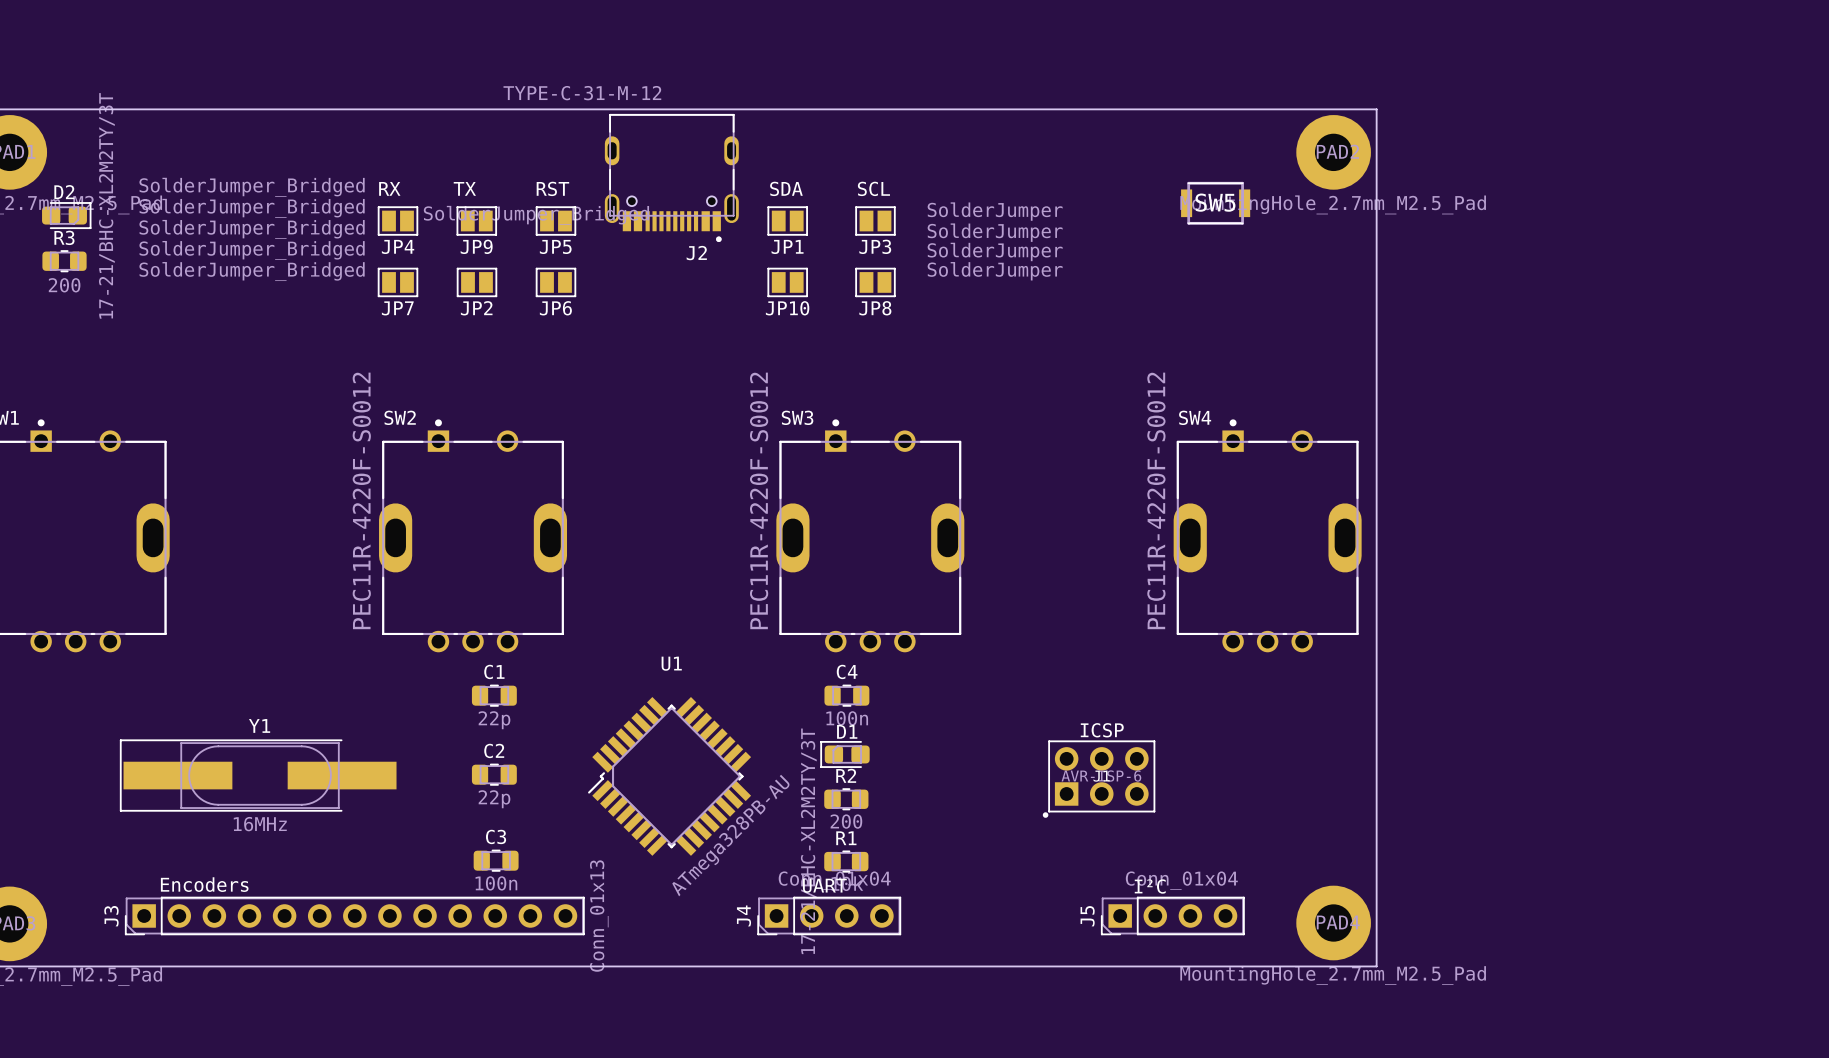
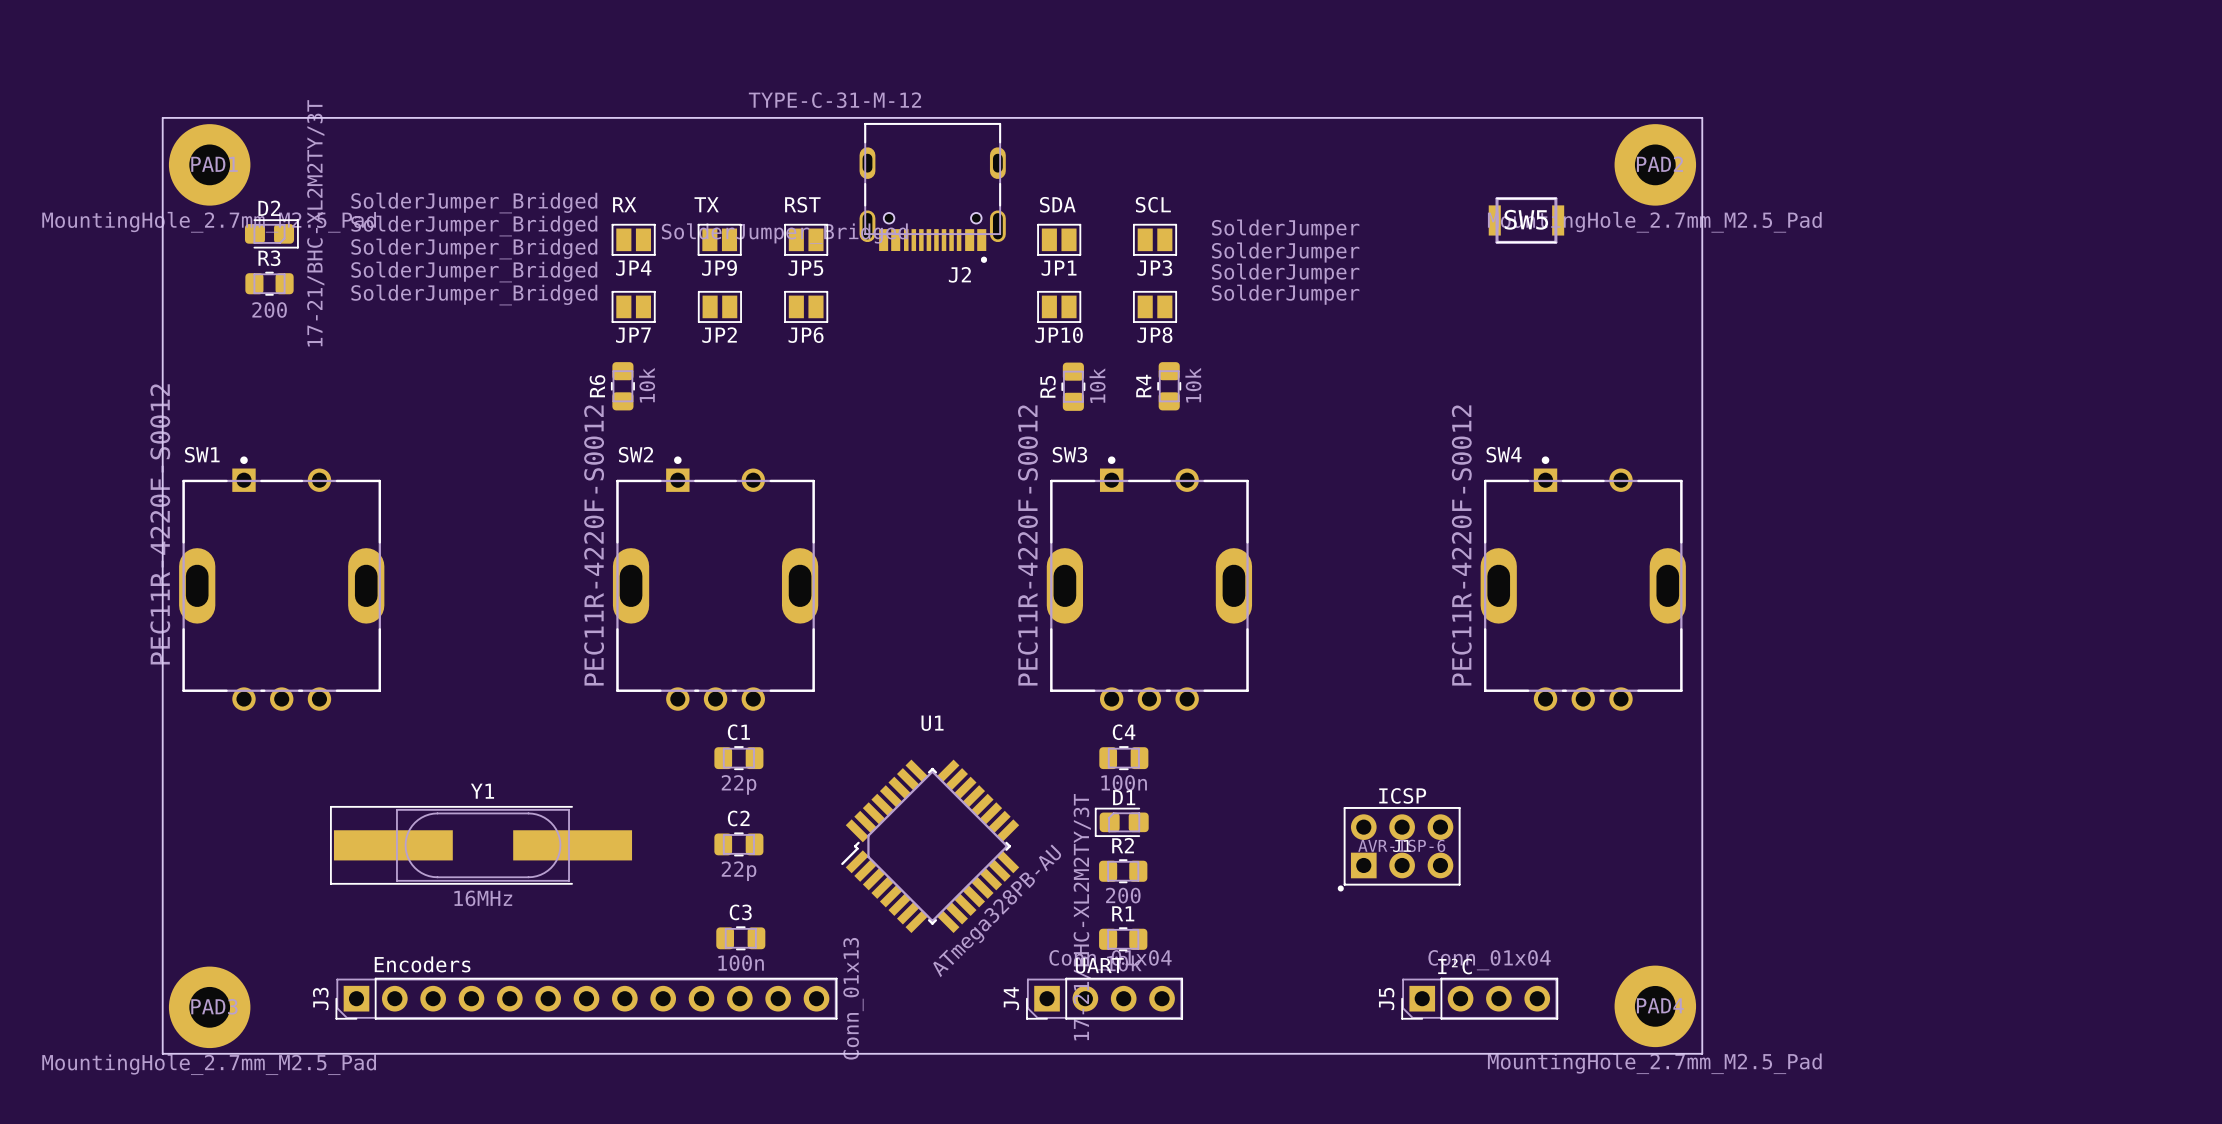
R6: none -> 10k (622, 386)
R5: none -> 10k (1073, 386)
R4: none -> 10k (1169, 386)

